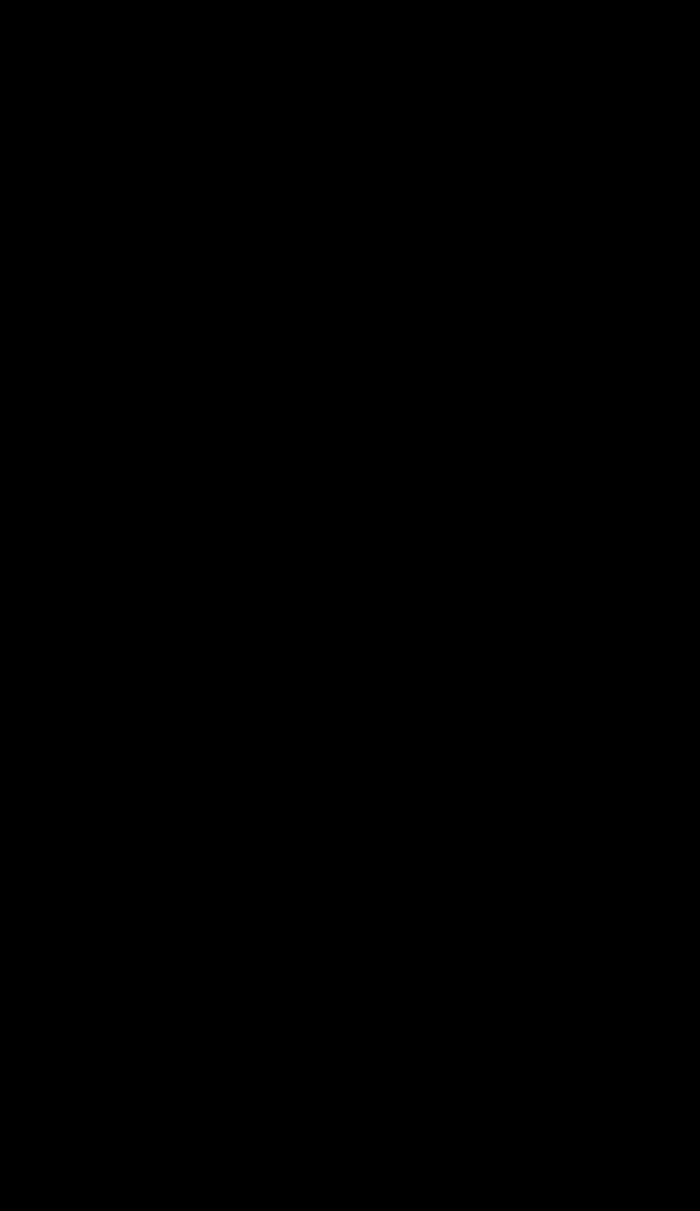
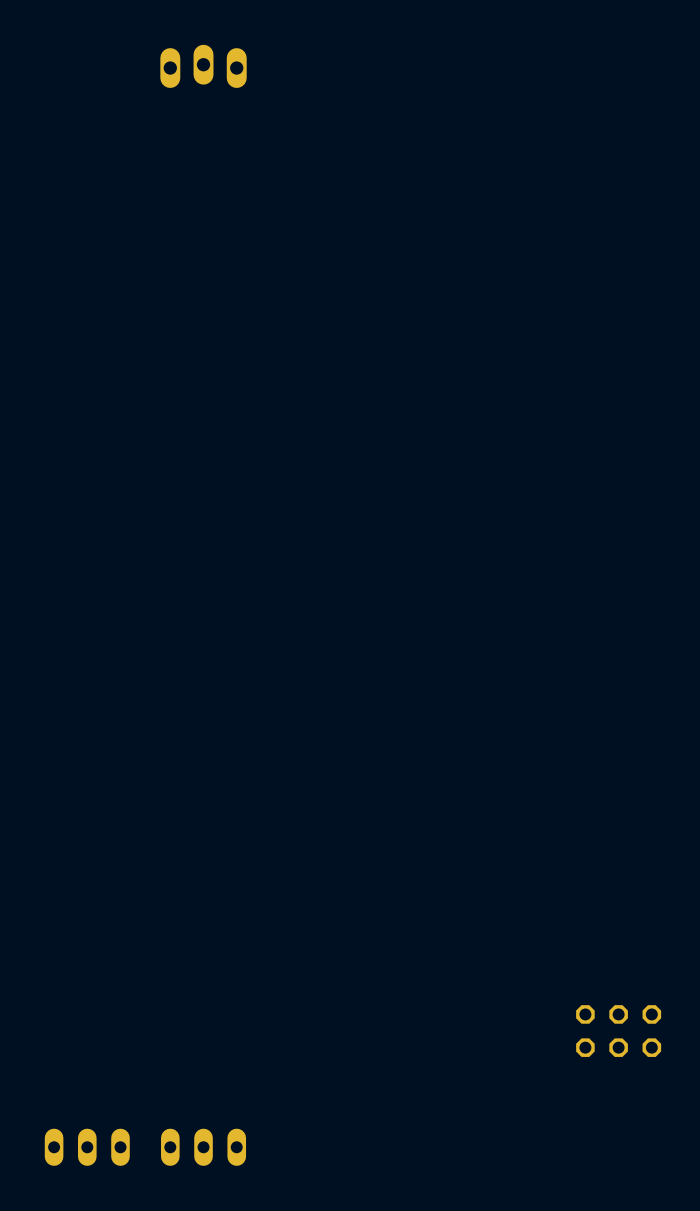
part: none -> (203, 66)
part: none -> (618, 1031)
part: none -> (87, 1147)
part: none -> (203, 1147)

